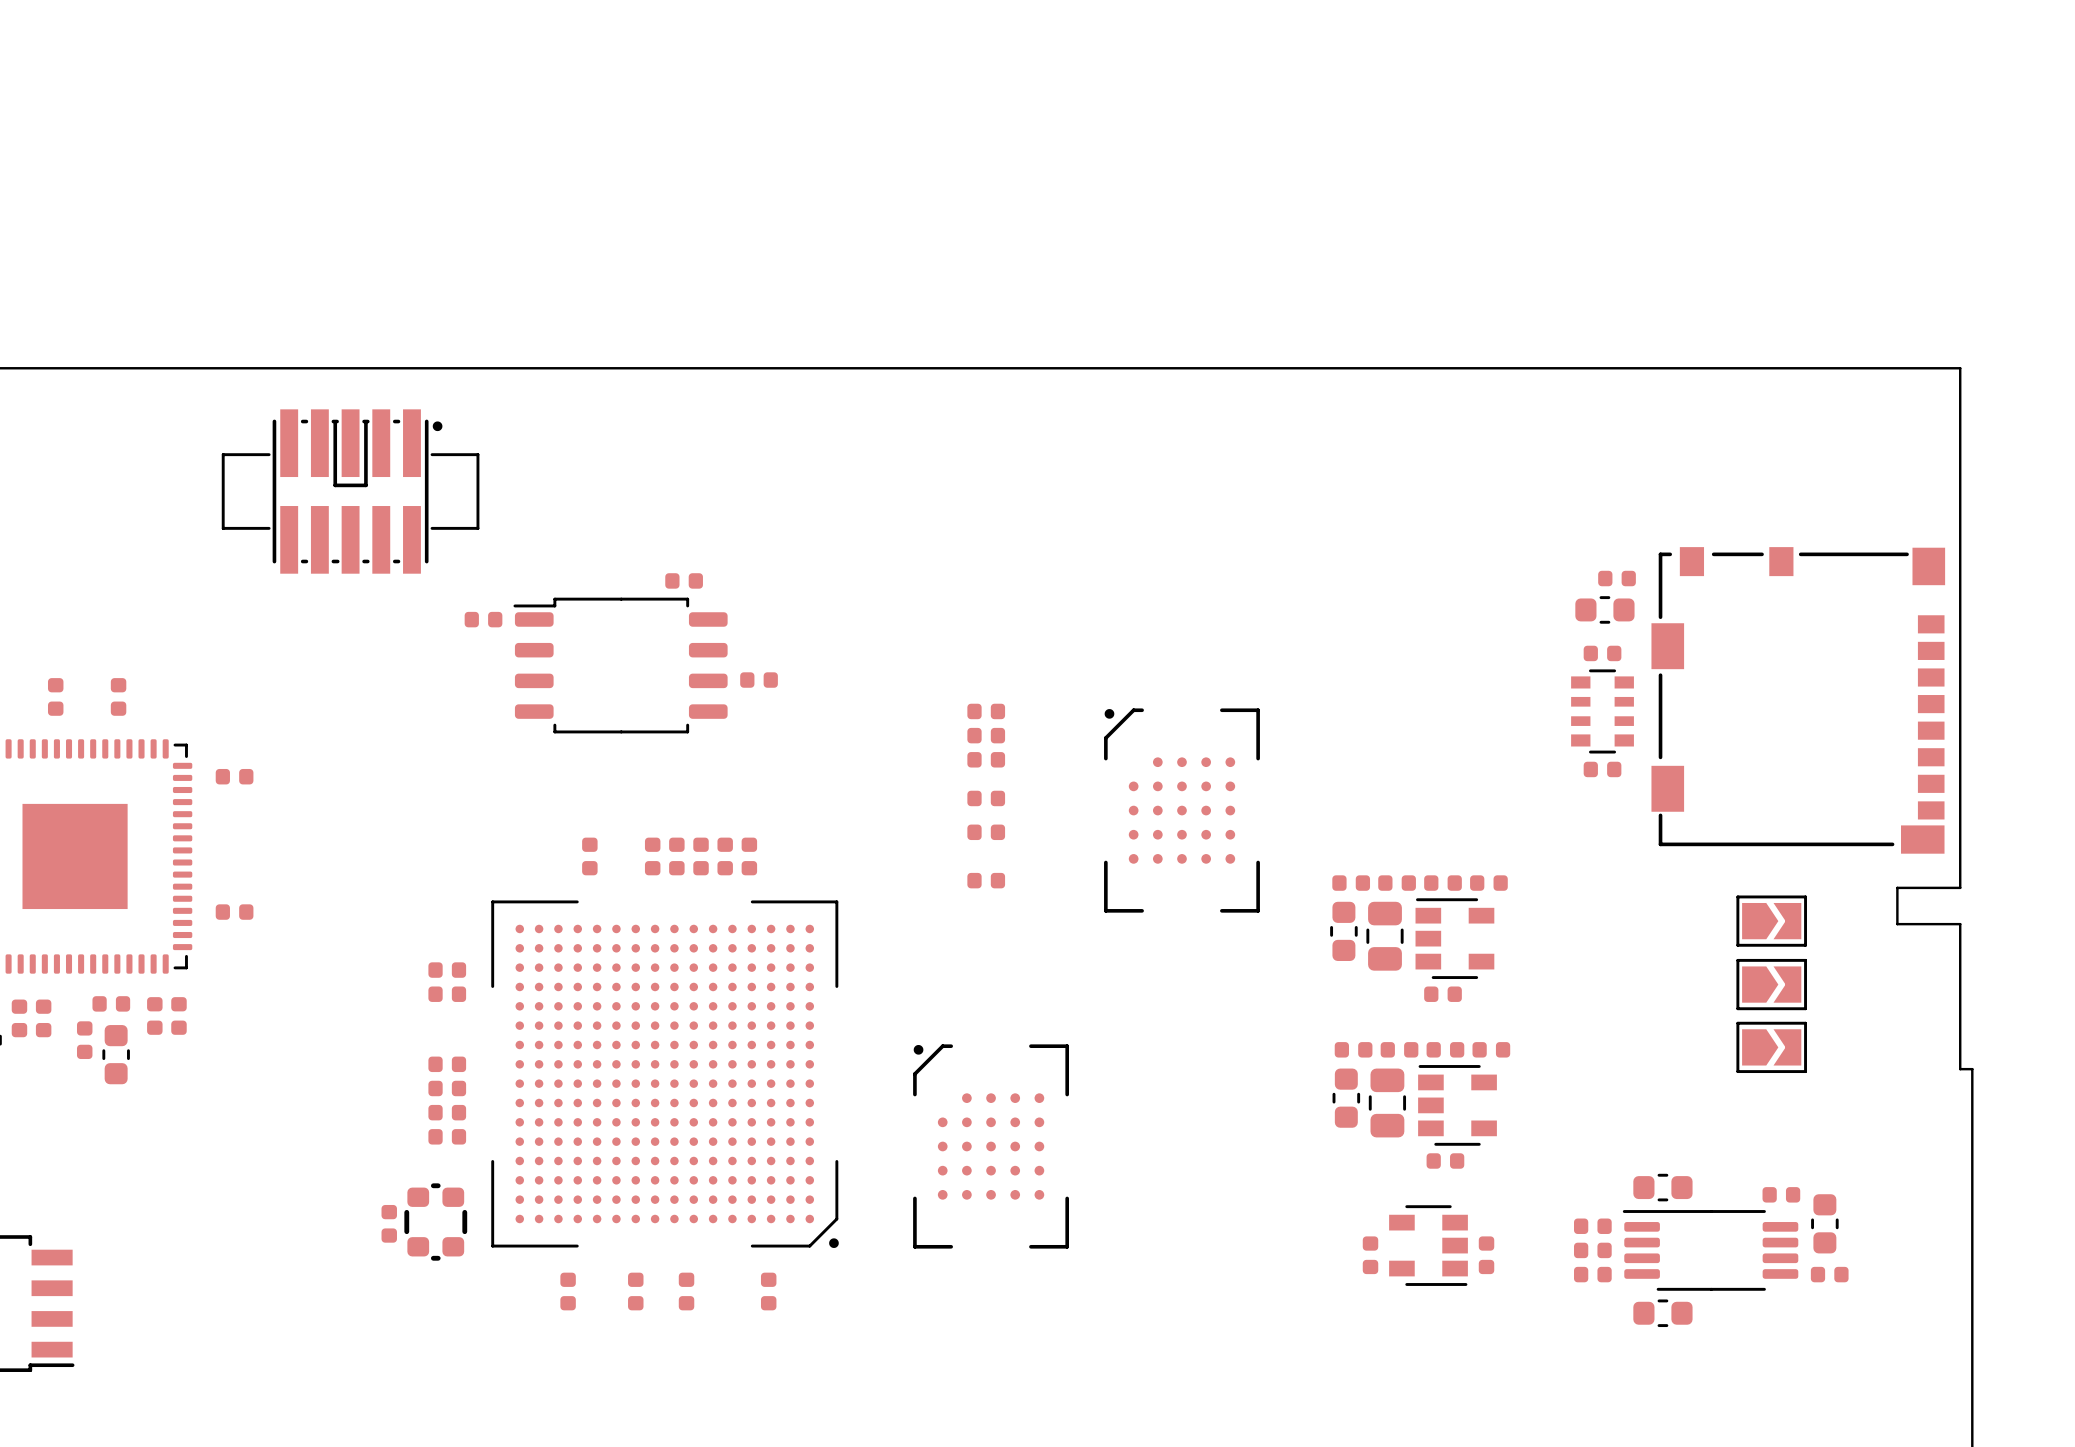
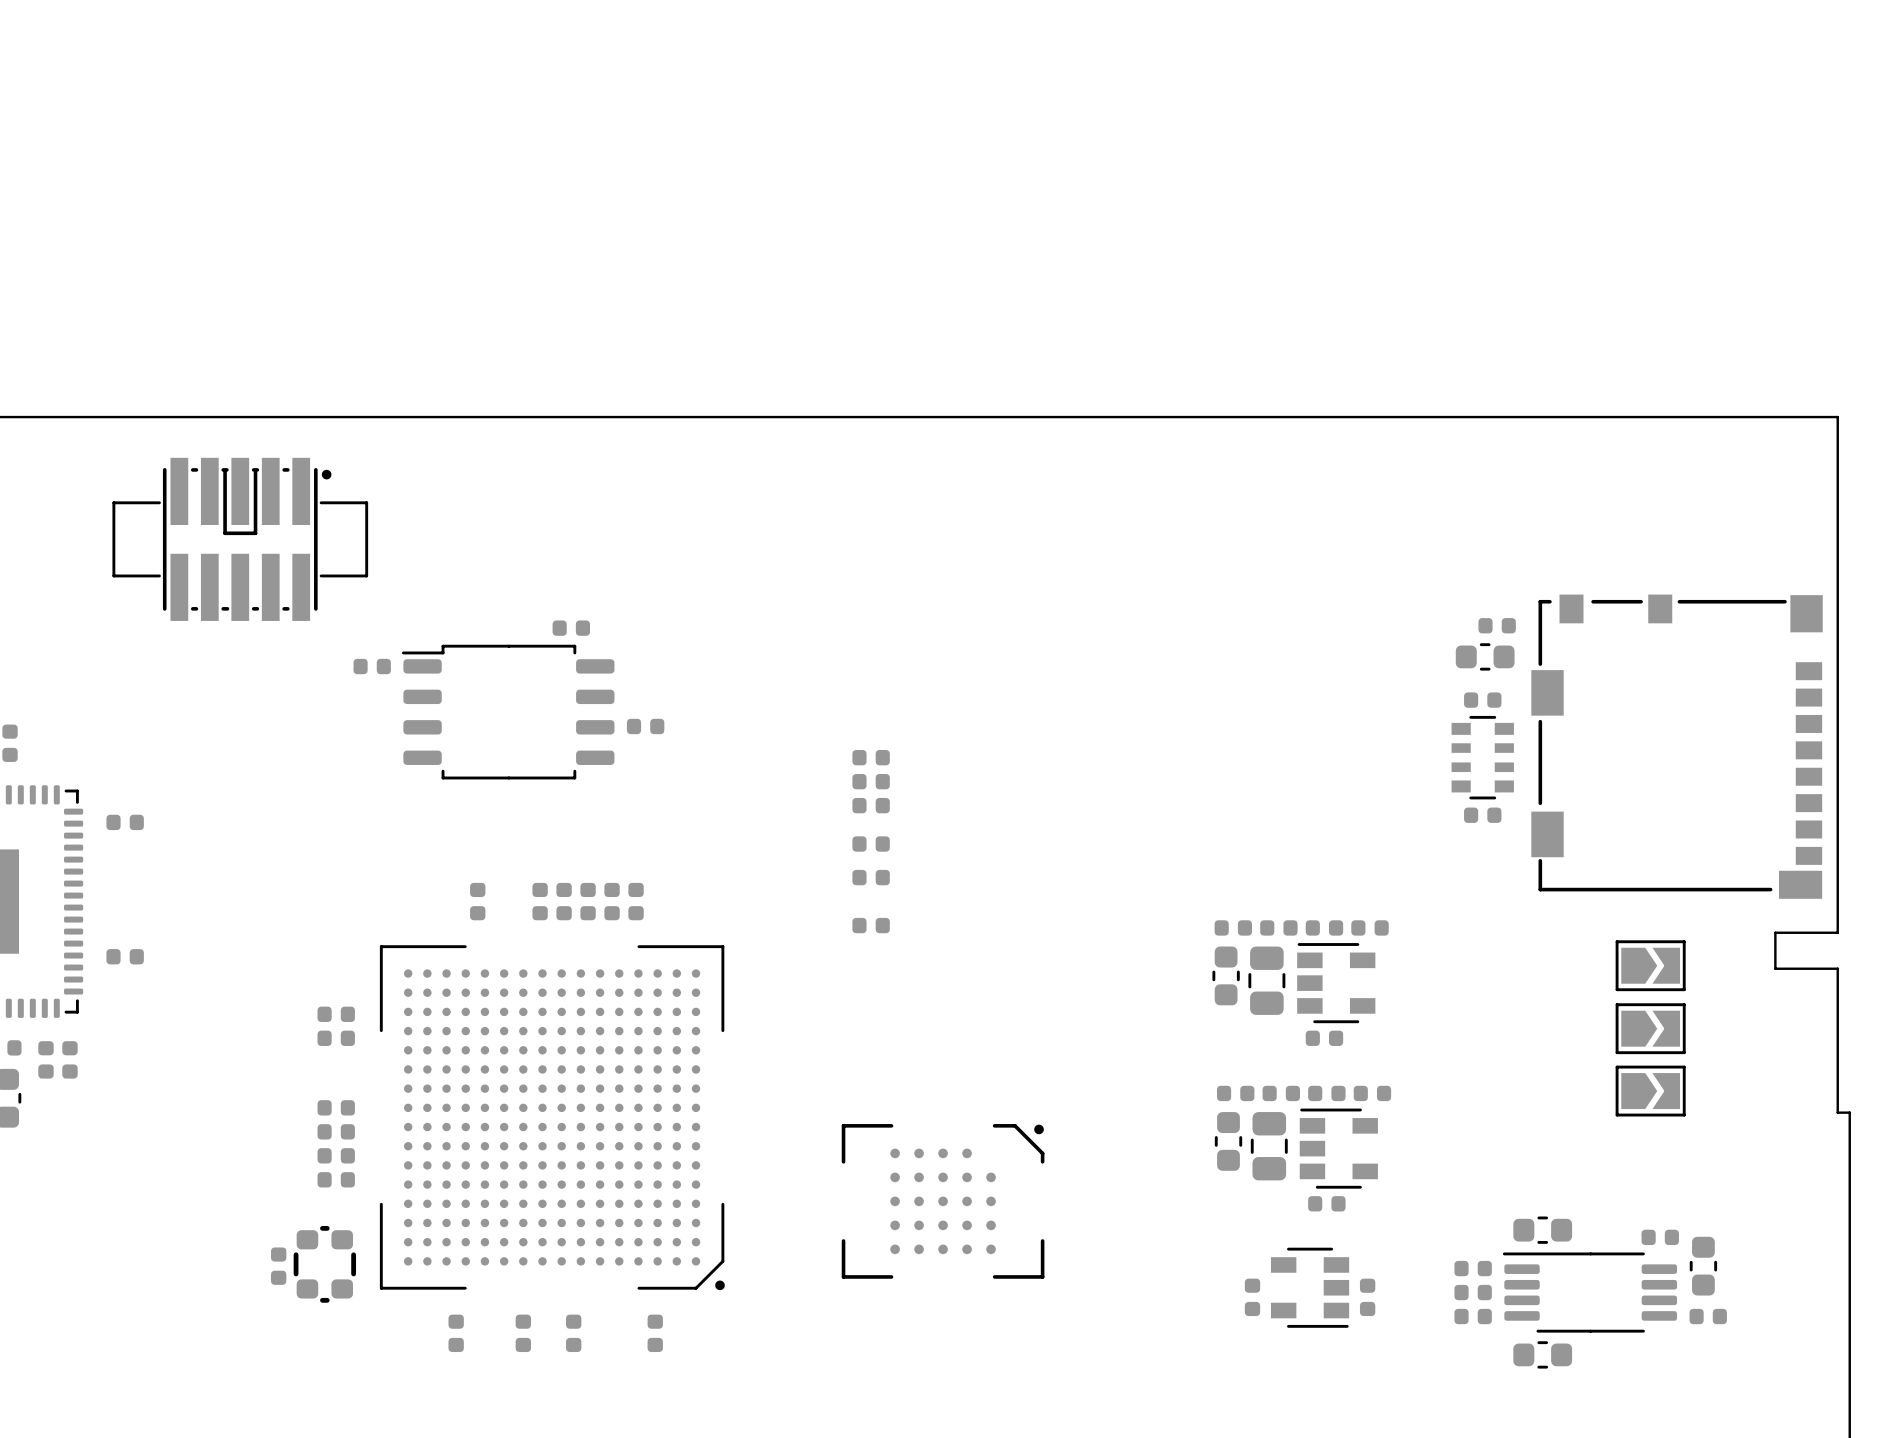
part: (1181, 810) -> none
part rotation: 0° (991, 1146) -> 90° clockwise (943, 1201)

